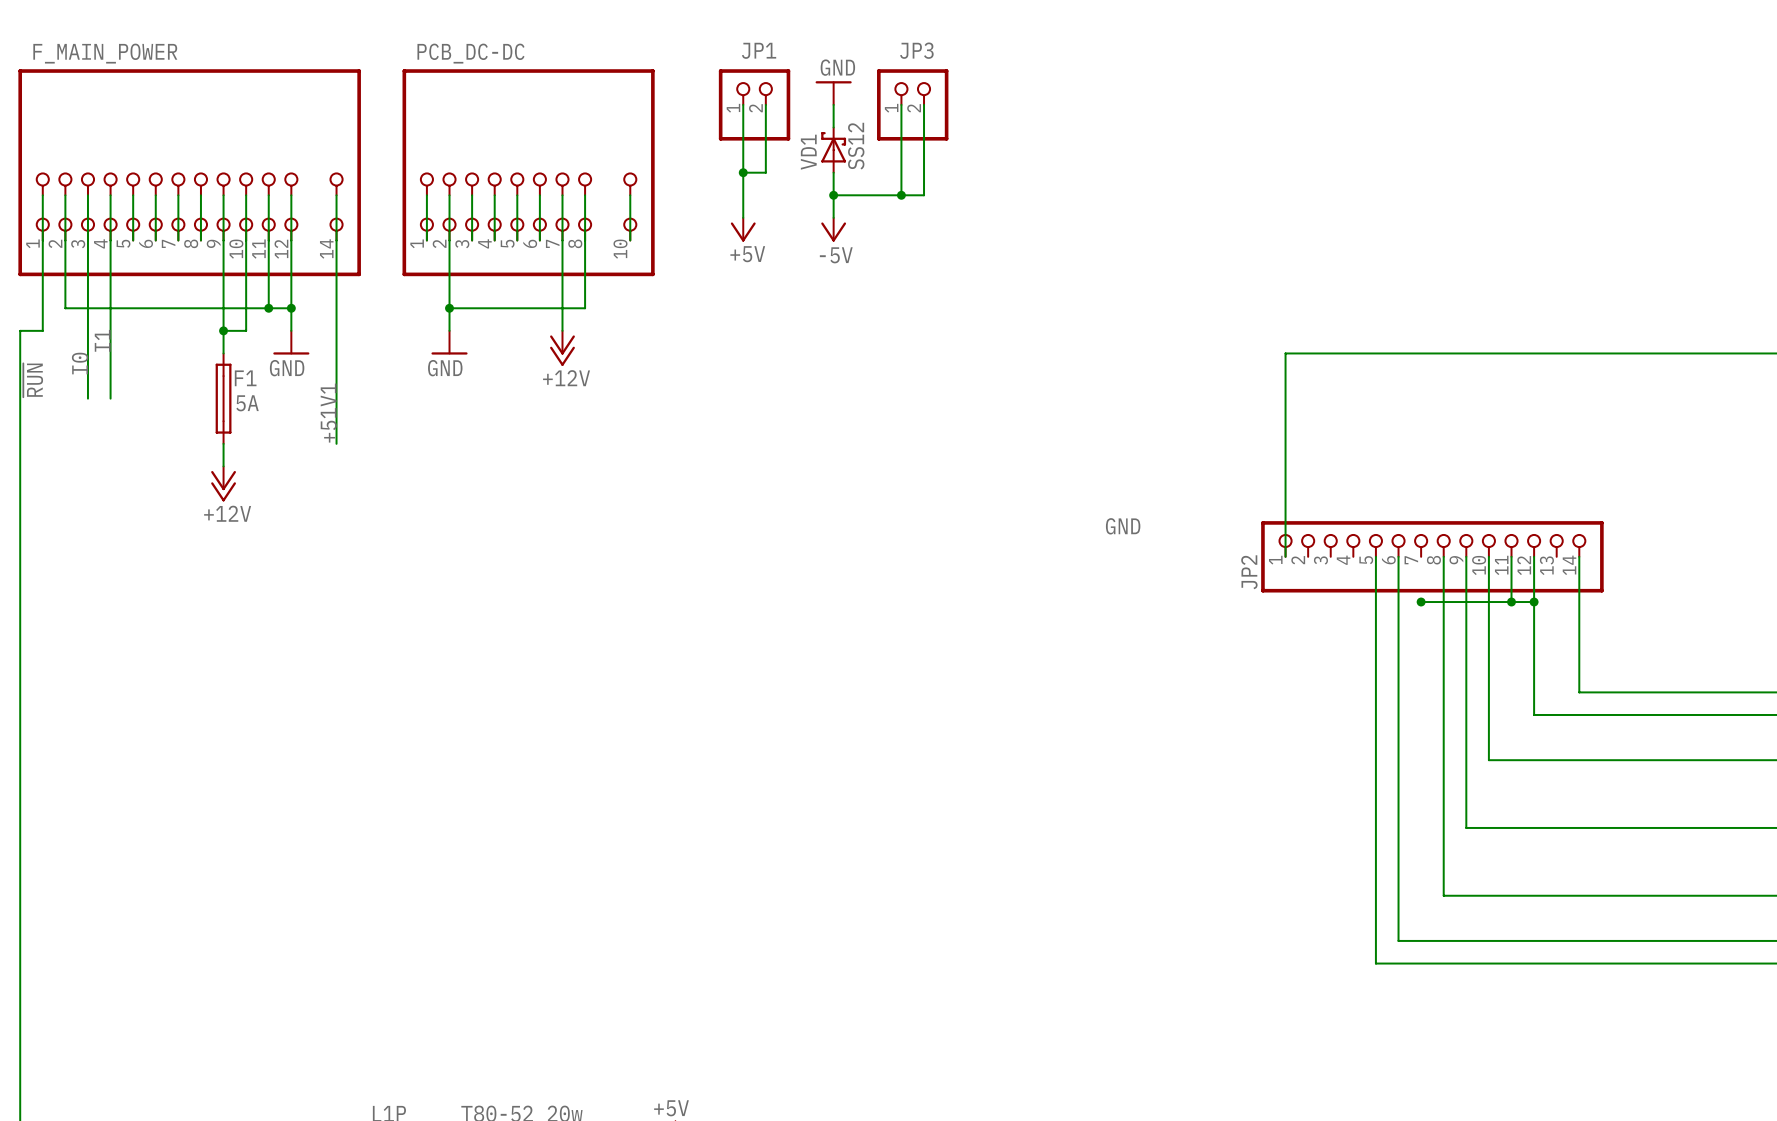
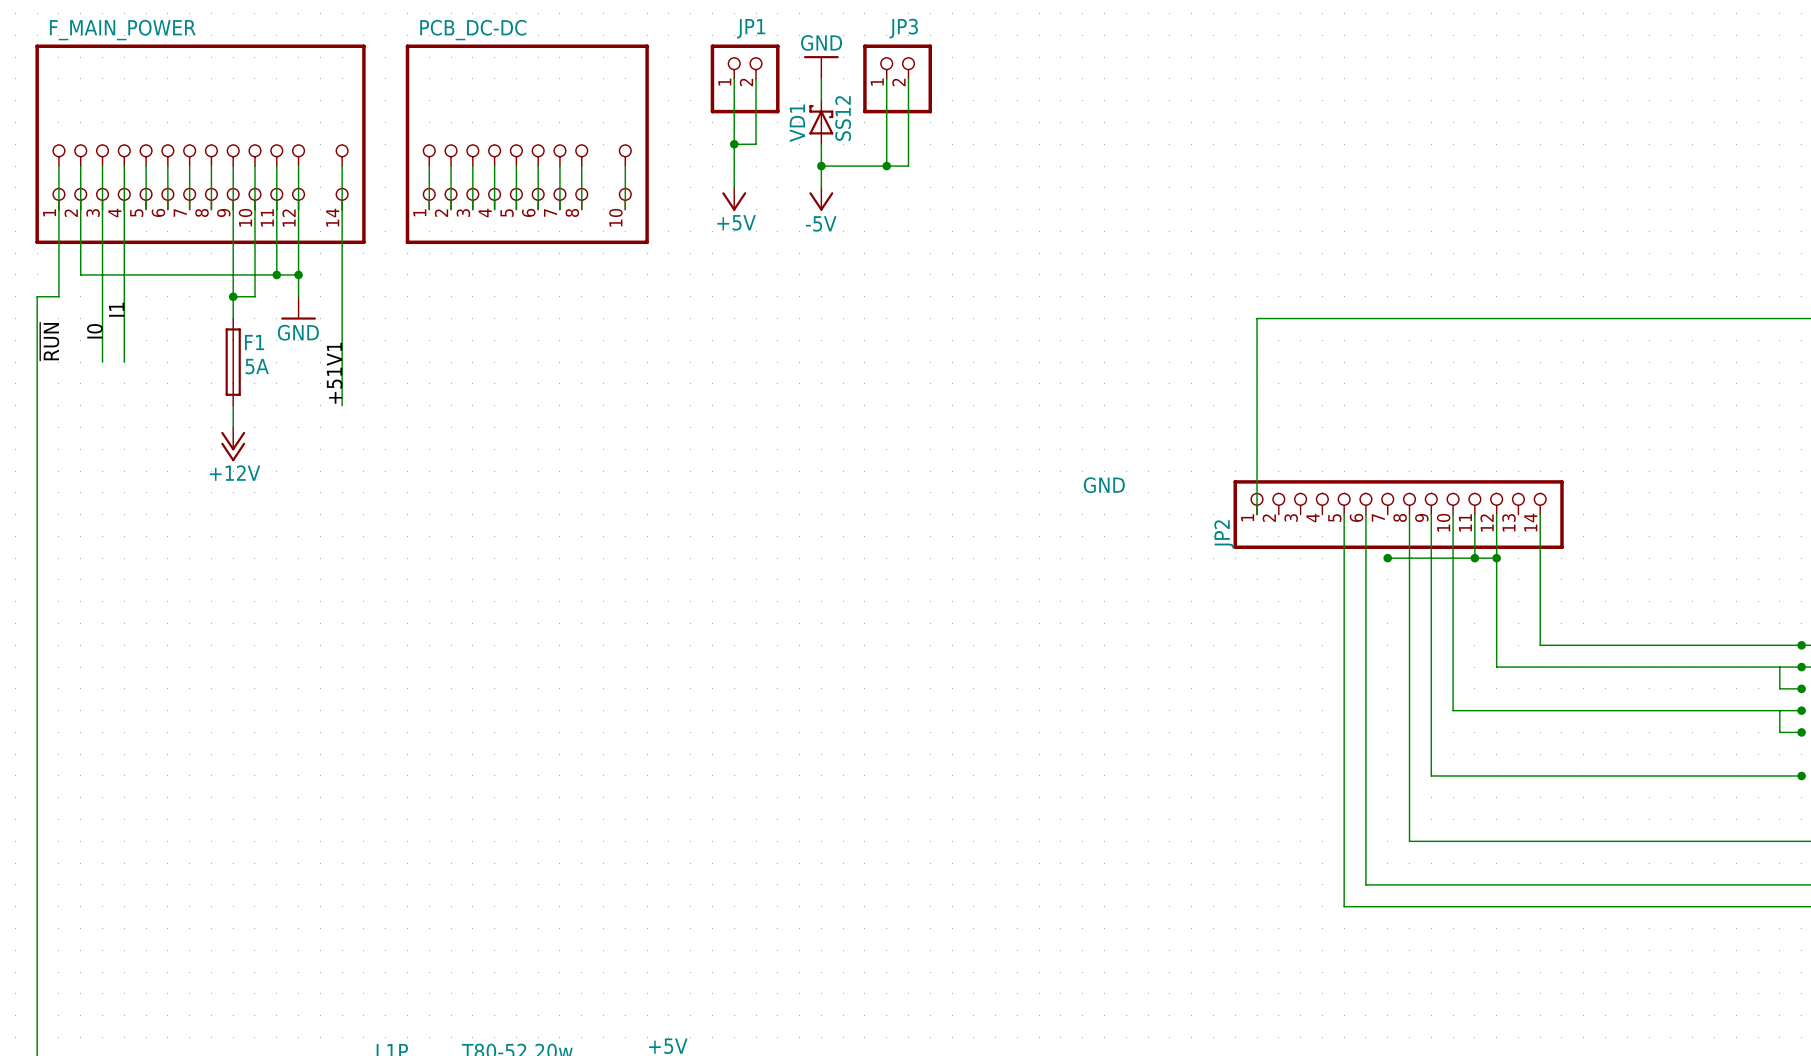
wire: (449, 240) (449, 330) -> none
wire: (562, 240) (562, 330) -> none
wire: (585, 240) (585, 308) (449, 308) -> none
junction: (449, 308) -> none
power symbol: GND (449, 342) -> none
power symbol: +12V (562, 348) -> none

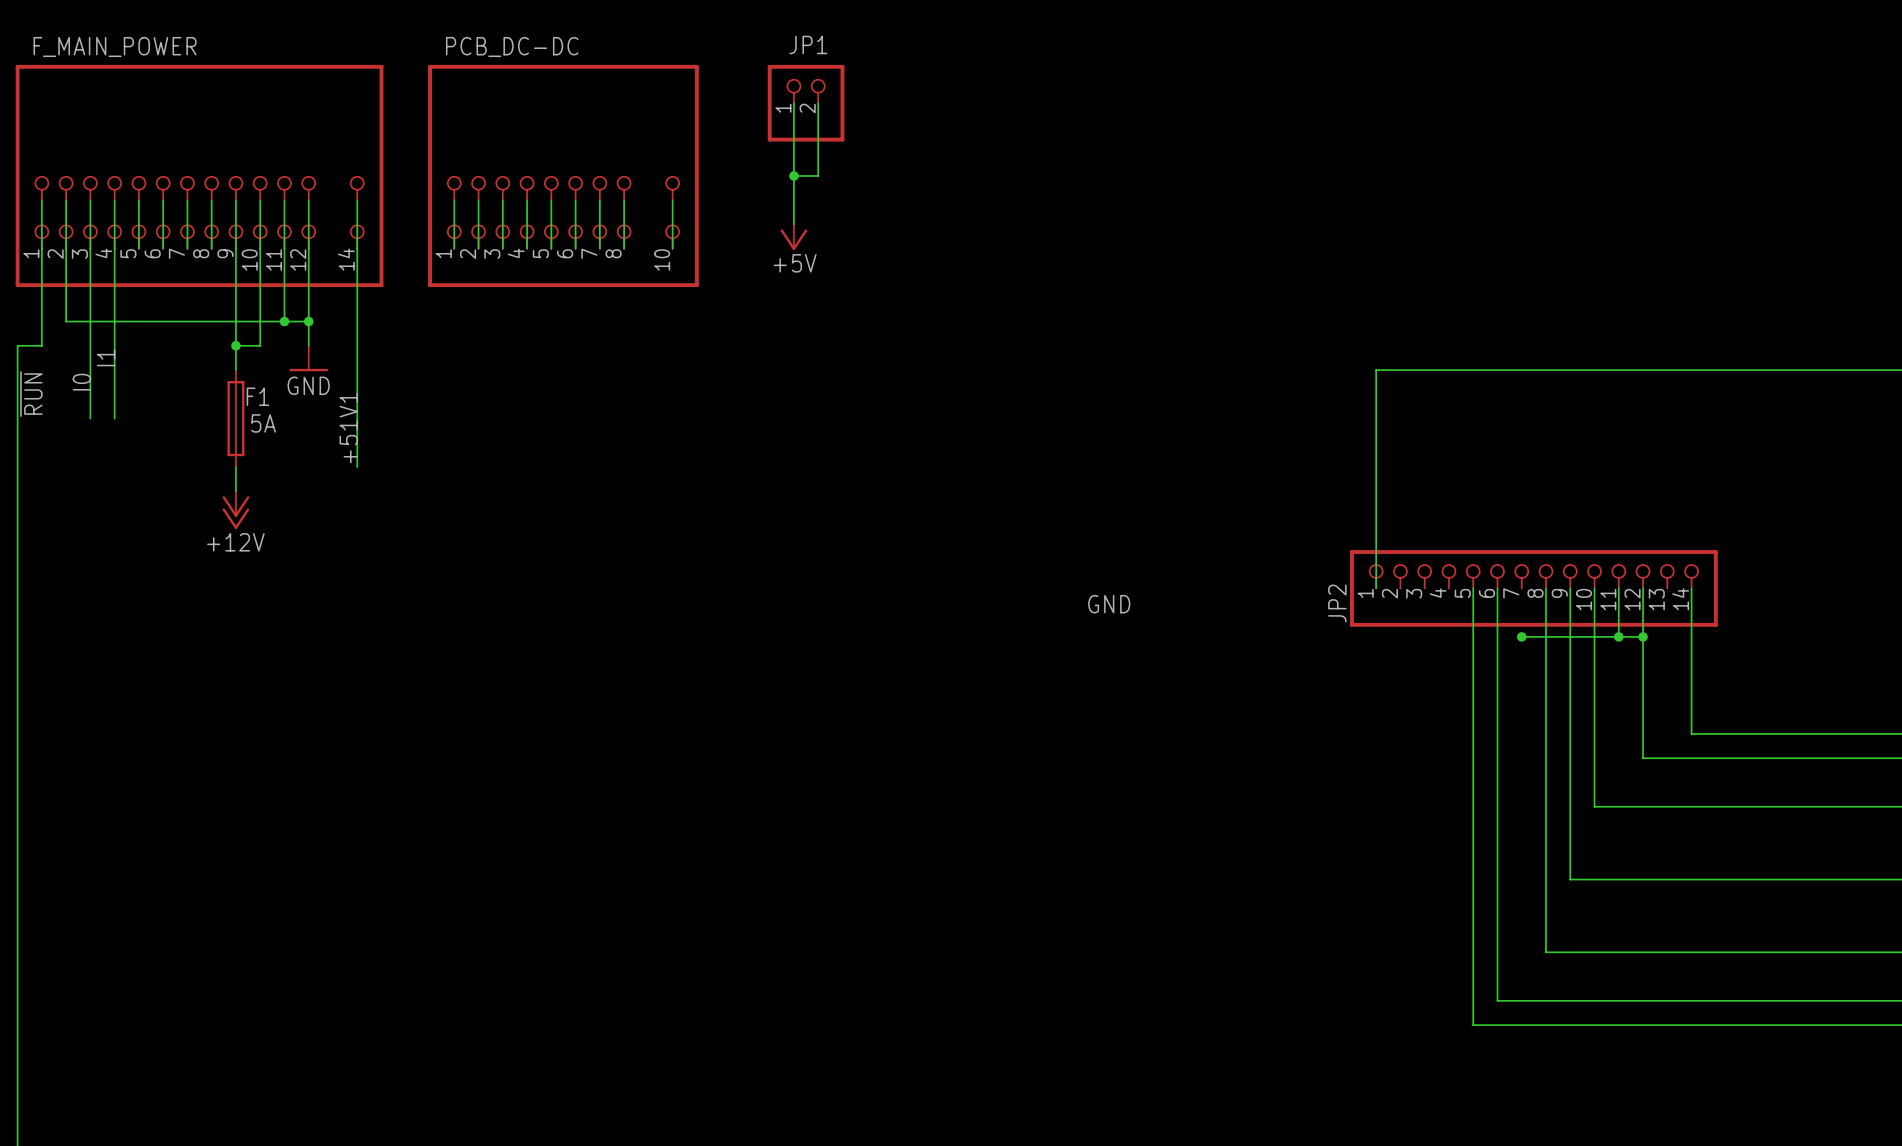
power symbol: GND (821, 67) -> none
wire: (821, 78) (821, 100) -> none
wire: (886, 78) (886, 166) -> none
JP3: (897, 78) -> none
wire: (908, 78) (908, 166) (821, 166) -> none
VD1: SS12 (821, 122) -> none
wire: (821, 144) (821, 187) -> none
junction: (821, 166) -> none
junction: (886, 166) -> none
power symbol: -5V (821, 199) -> none
part position: (1104, 485) -> (1109, 604)

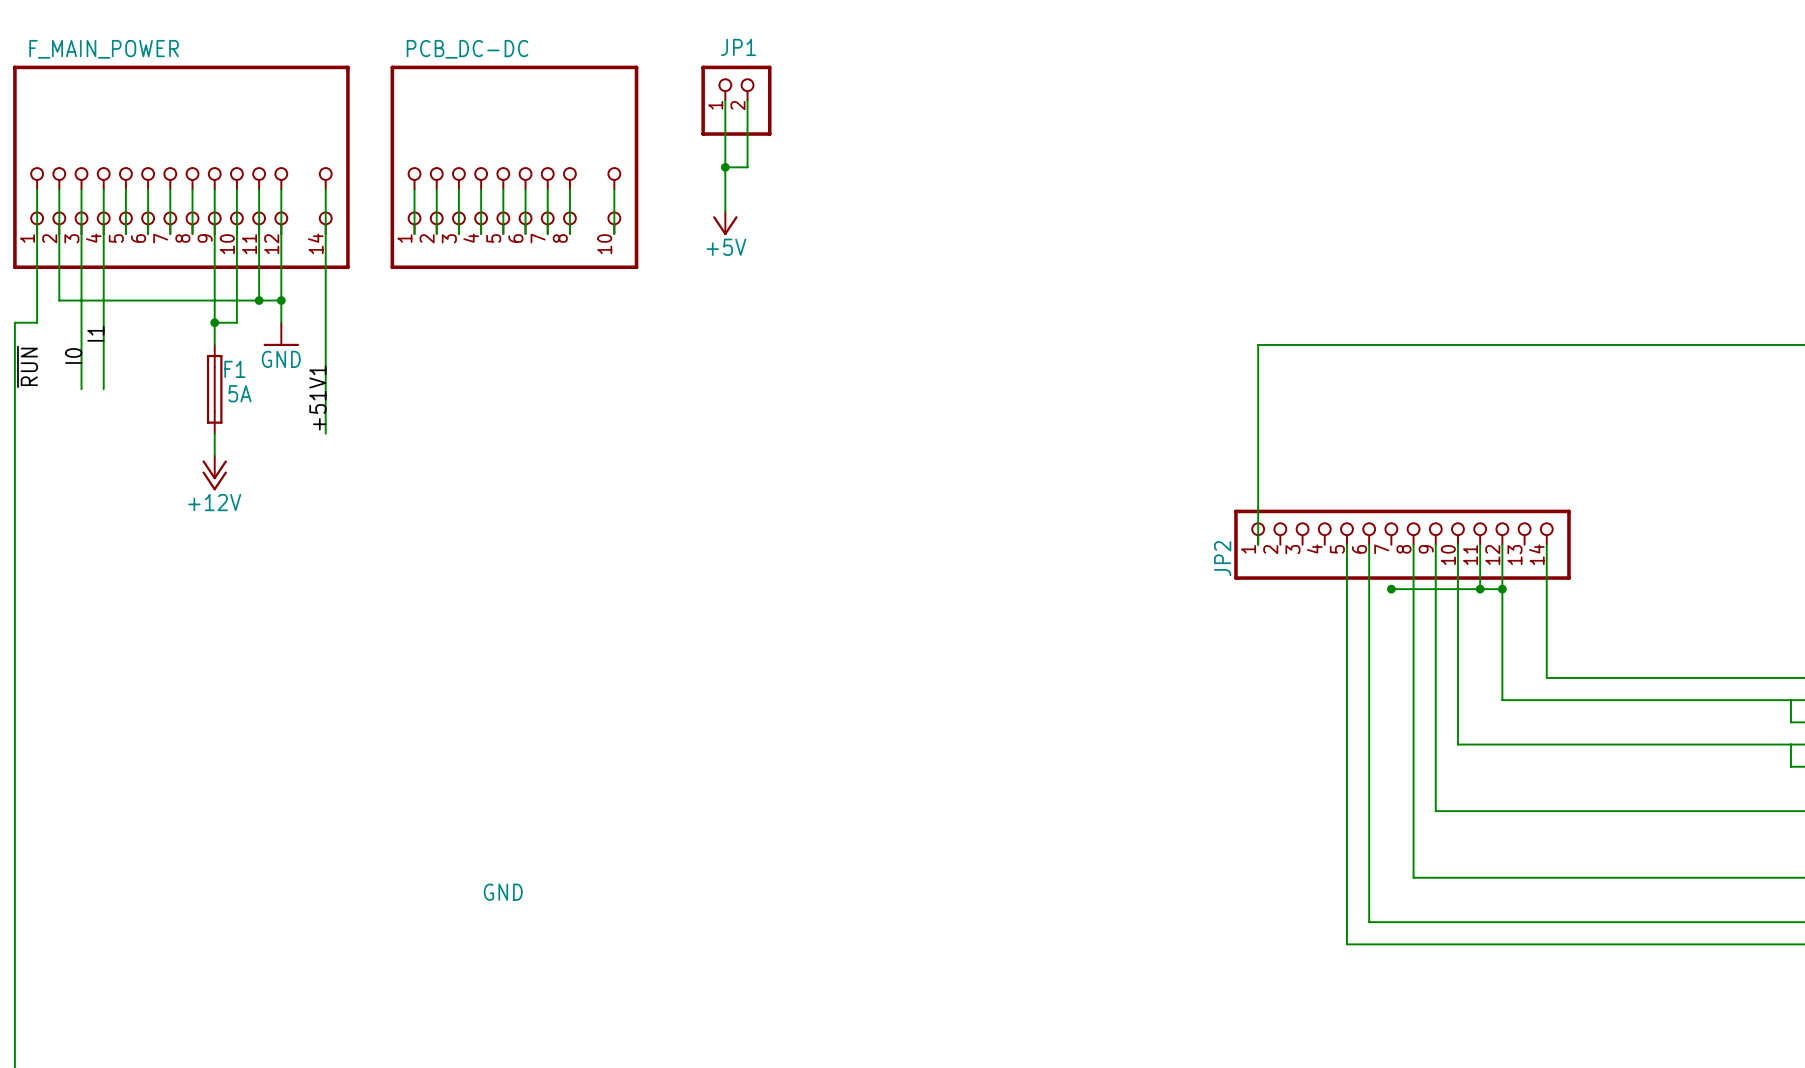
part: (1109, 604) -> none
part: none -> (503, 892)

